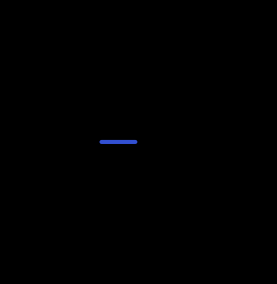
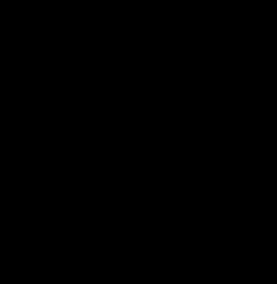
bottom track: (135, 141) (101, 141) -> none

